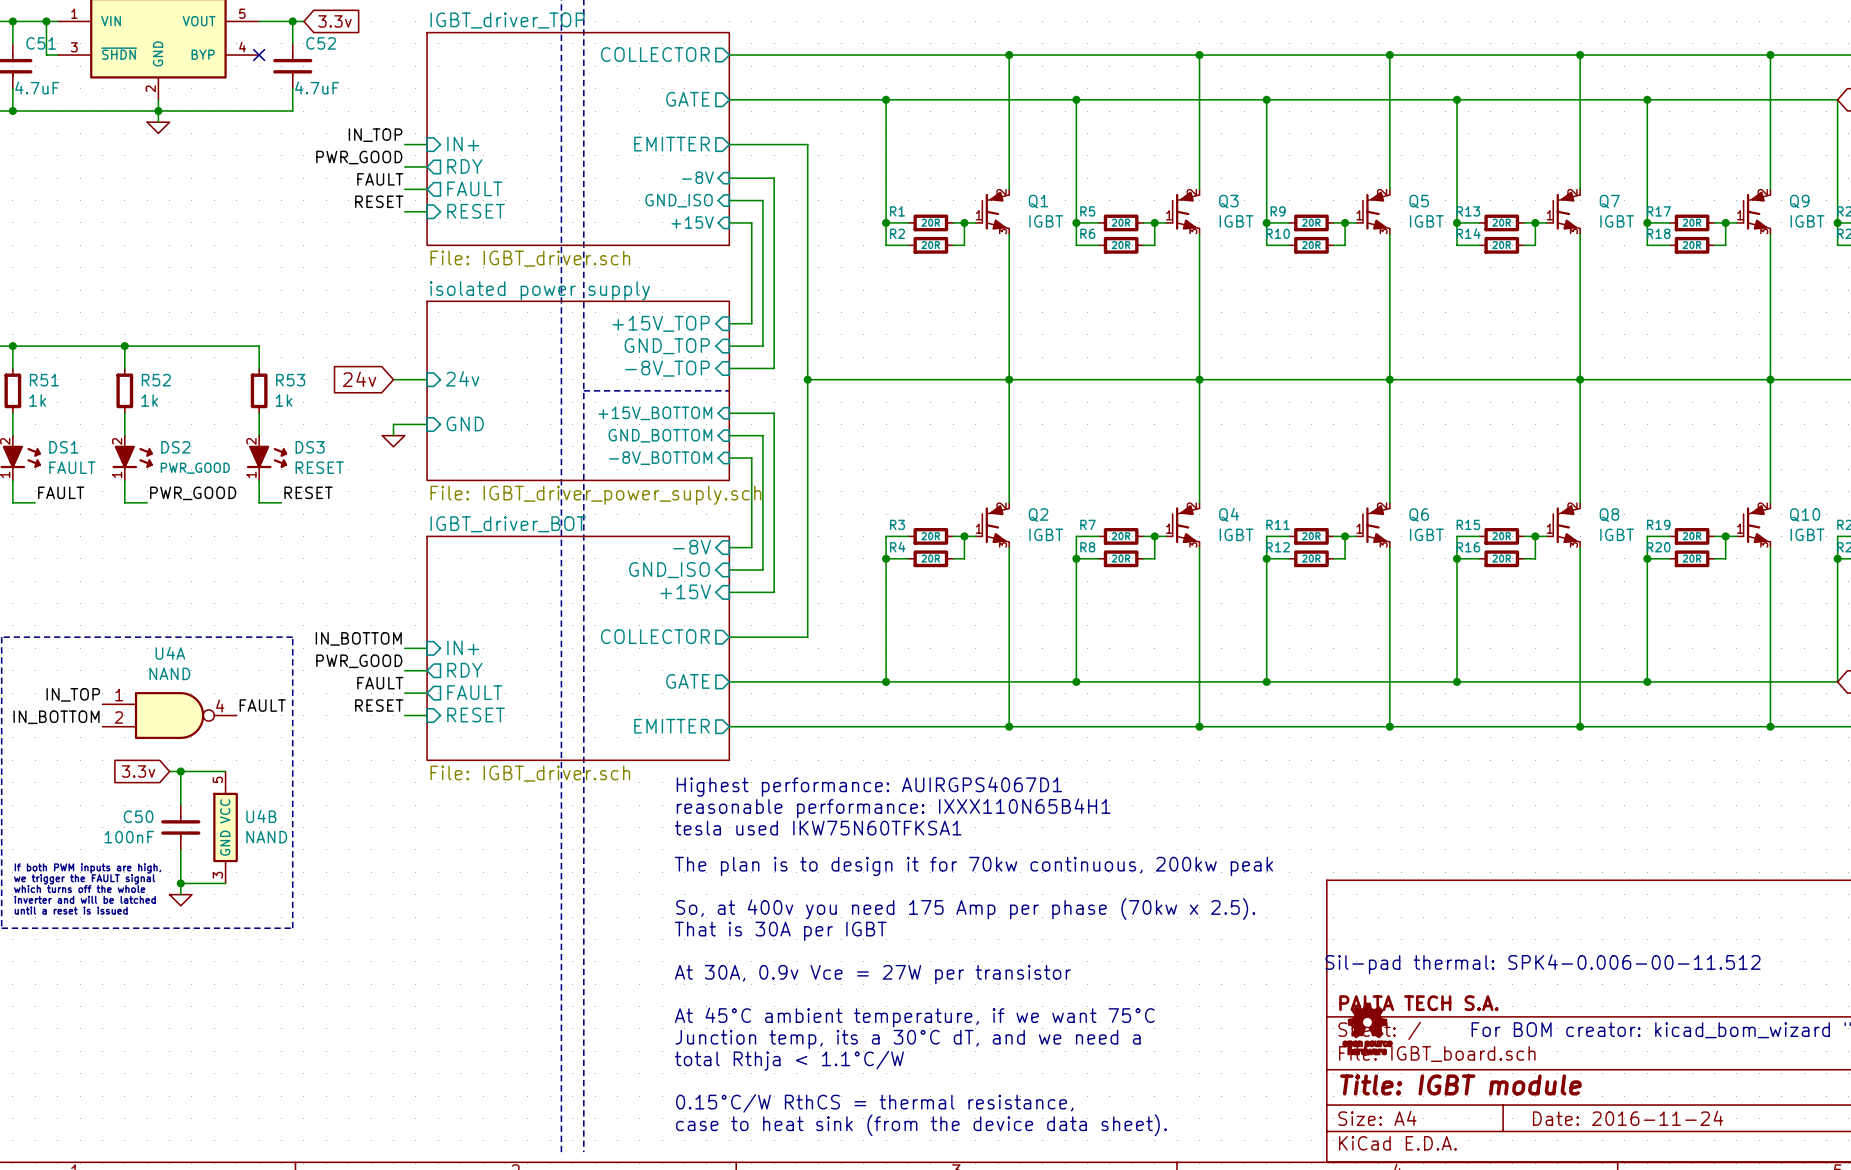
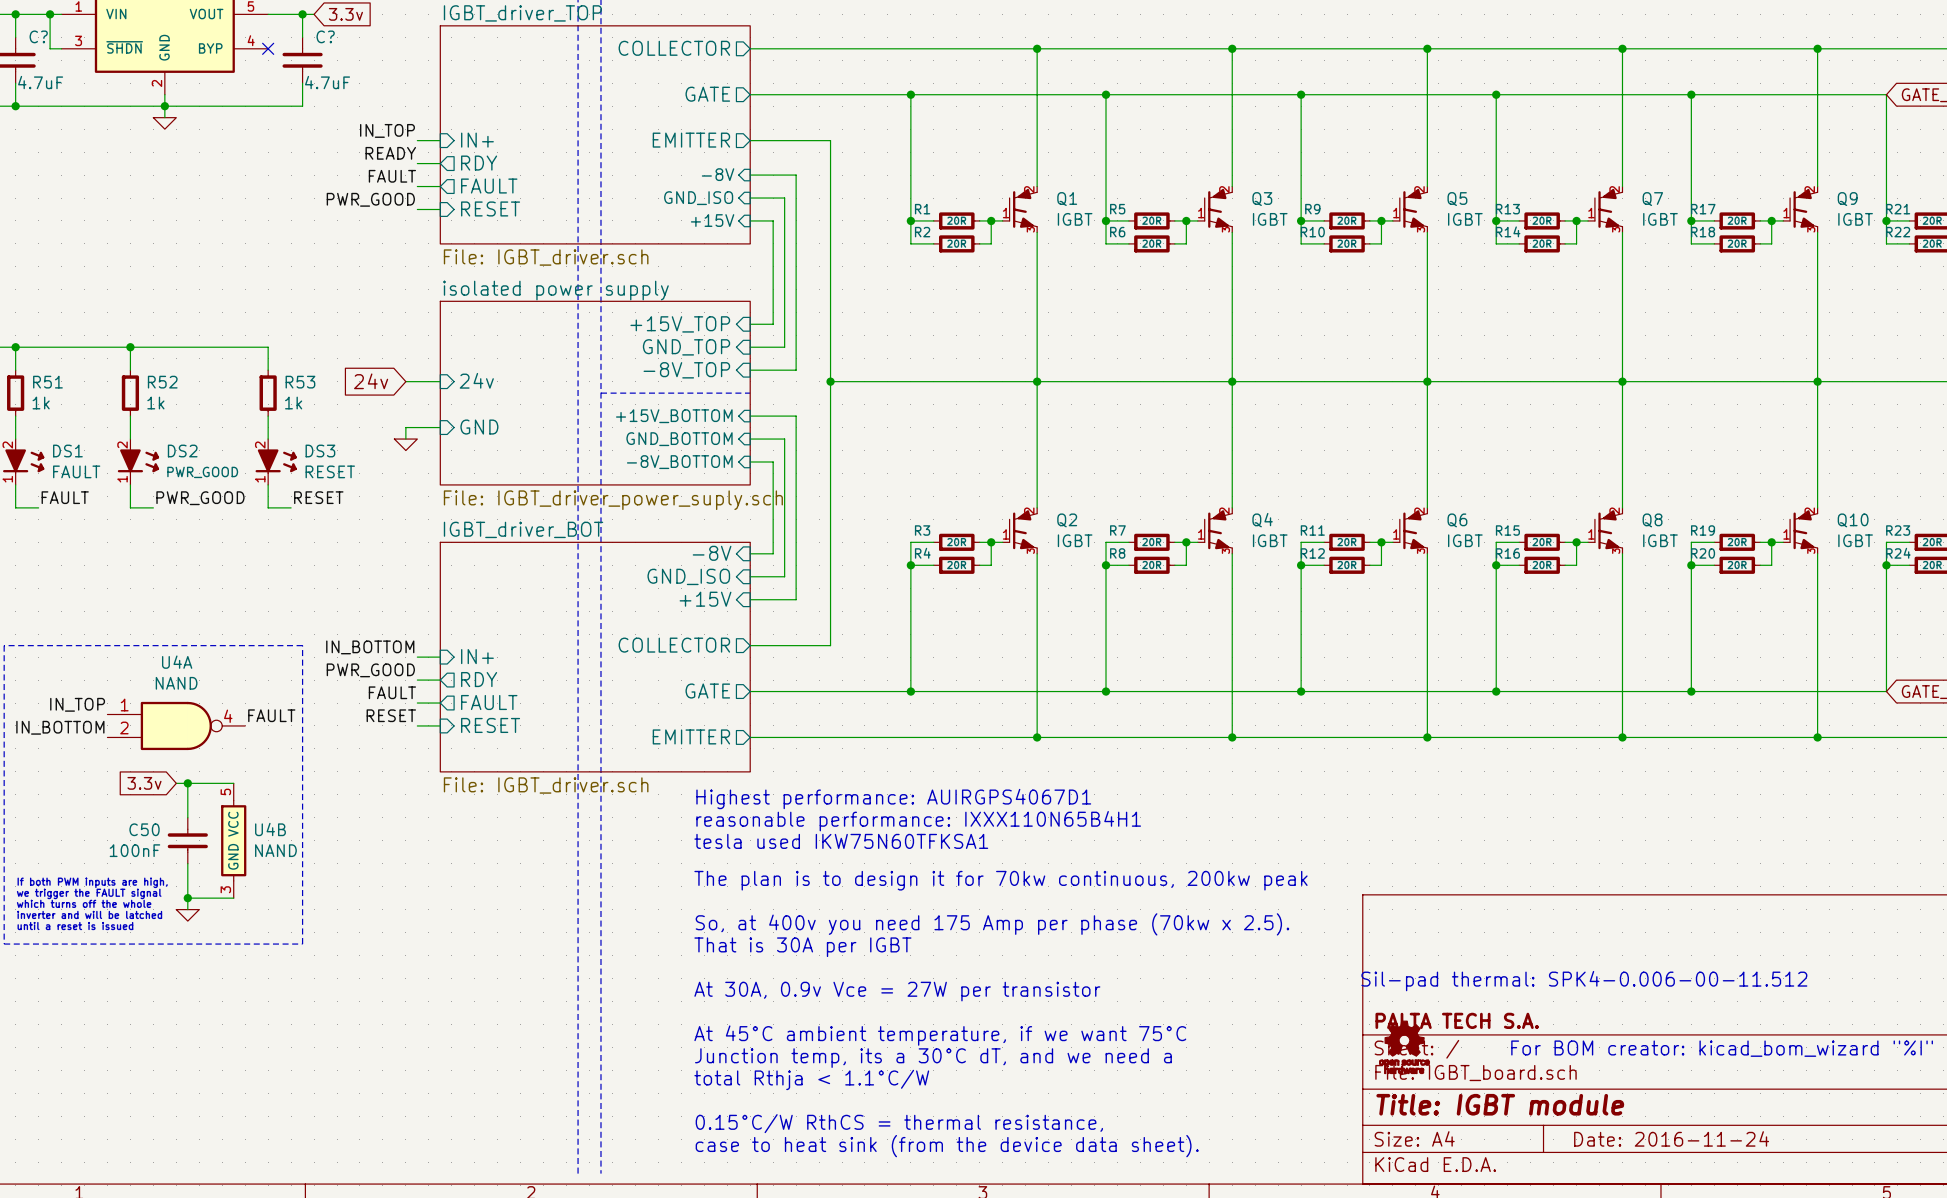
C51 name: C51 (41, 43) -> C? (38, 36)
C52 name: C52 (321, 43) -> C? (325, 36)
label: PWR_GOOD (359, 157) -> READY (390, 153)
label: RESET (379, 201) -> PWR_GOOD (370, 199)

